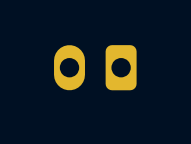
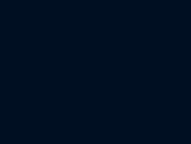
part: (95, 67) -> none

